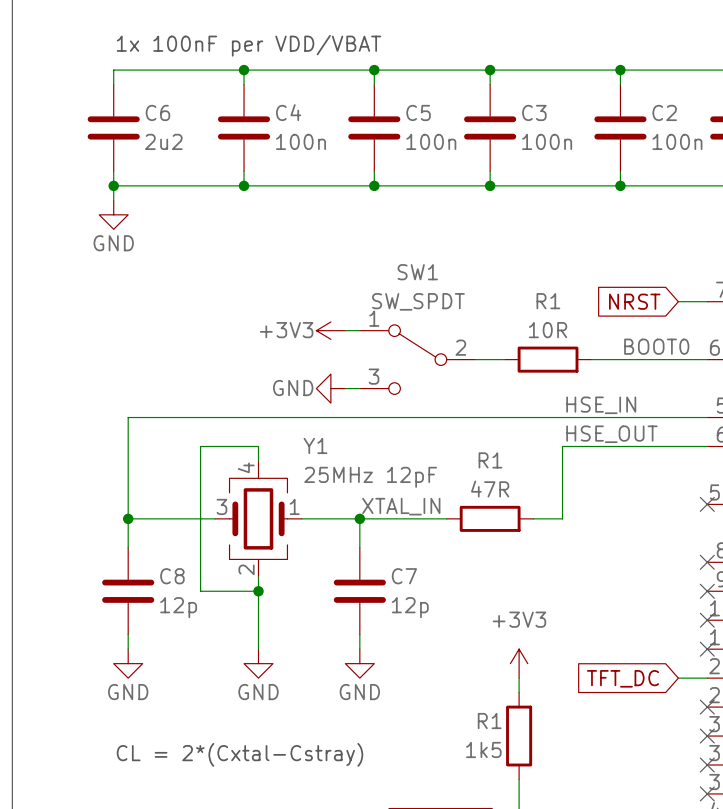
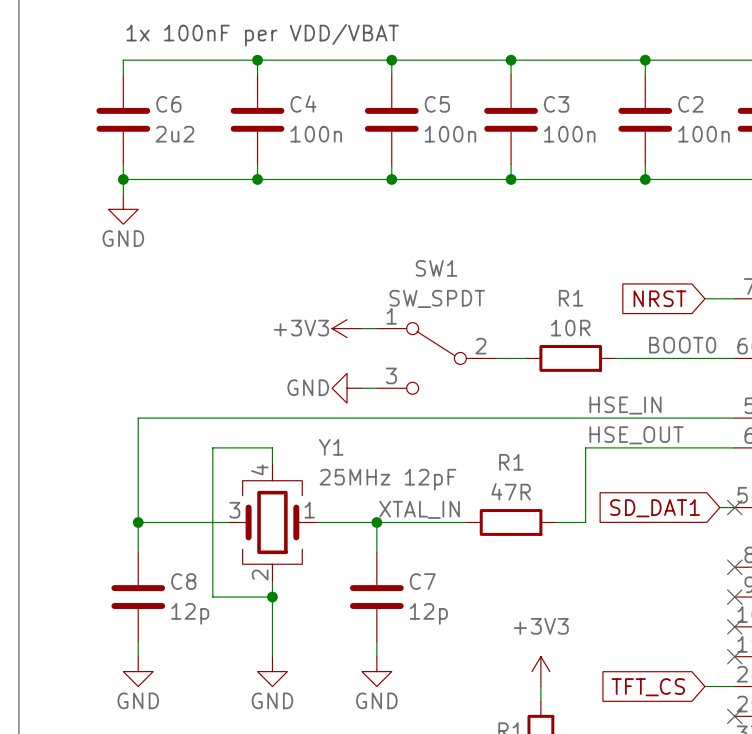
wire: none -> (719, 507) (734, 507)
global label: none -> SD_DAT1 (655, 508)
global label: TFT_DC (623, 678) -> TFT_CS (648, 687)

